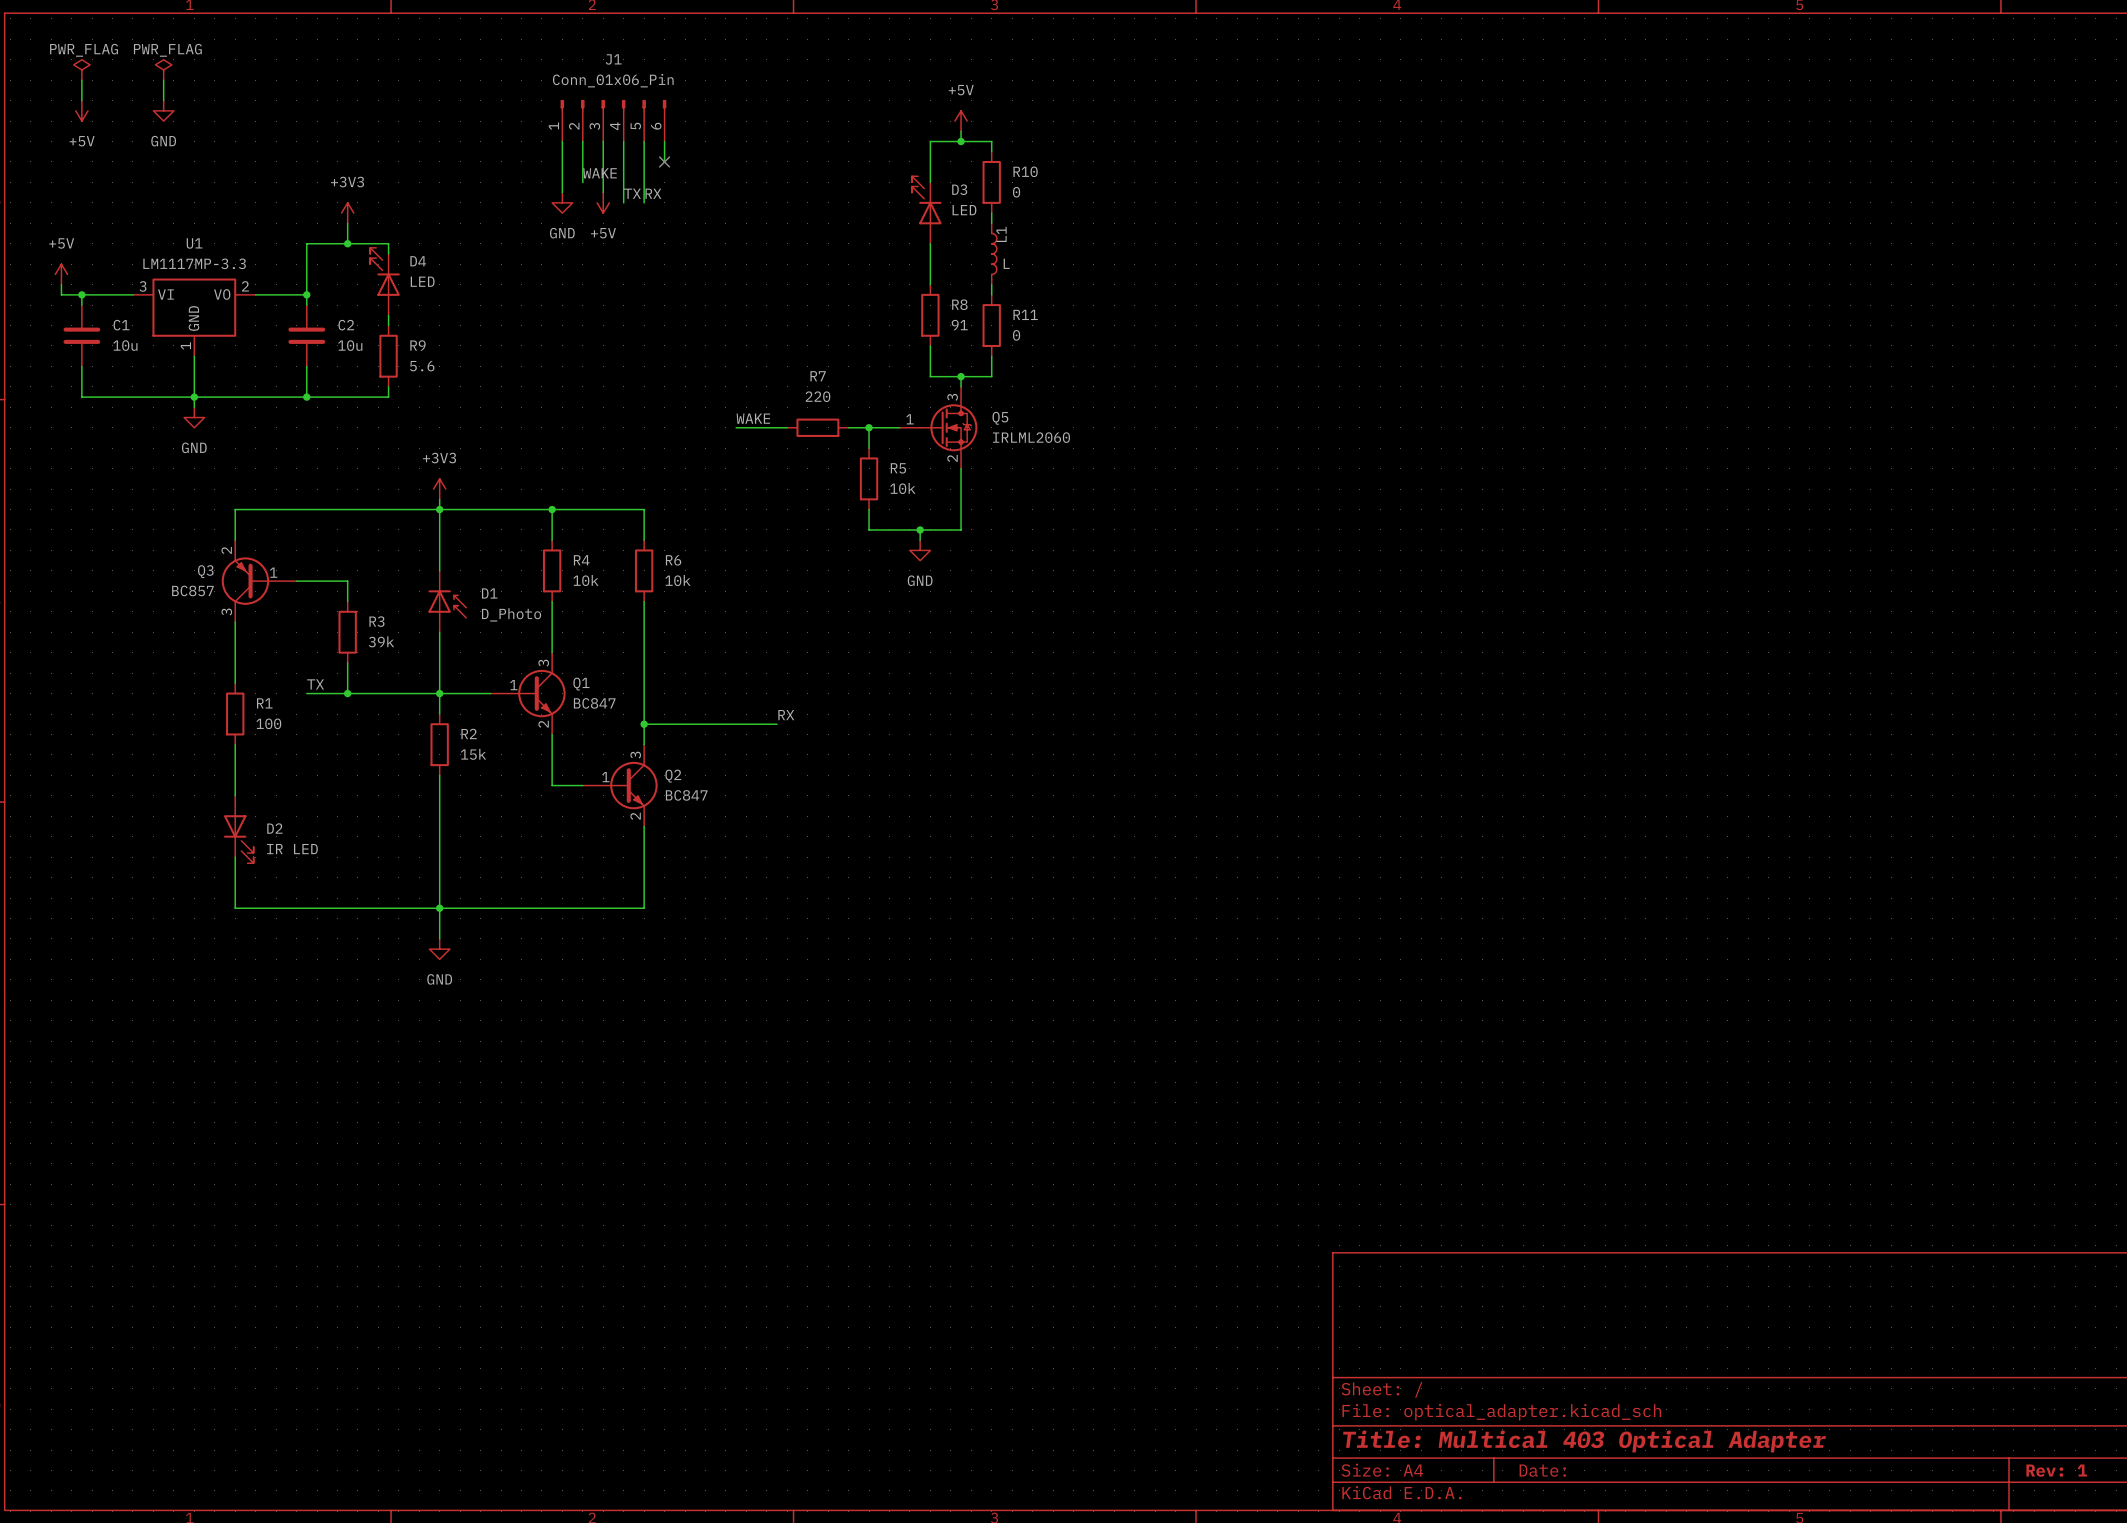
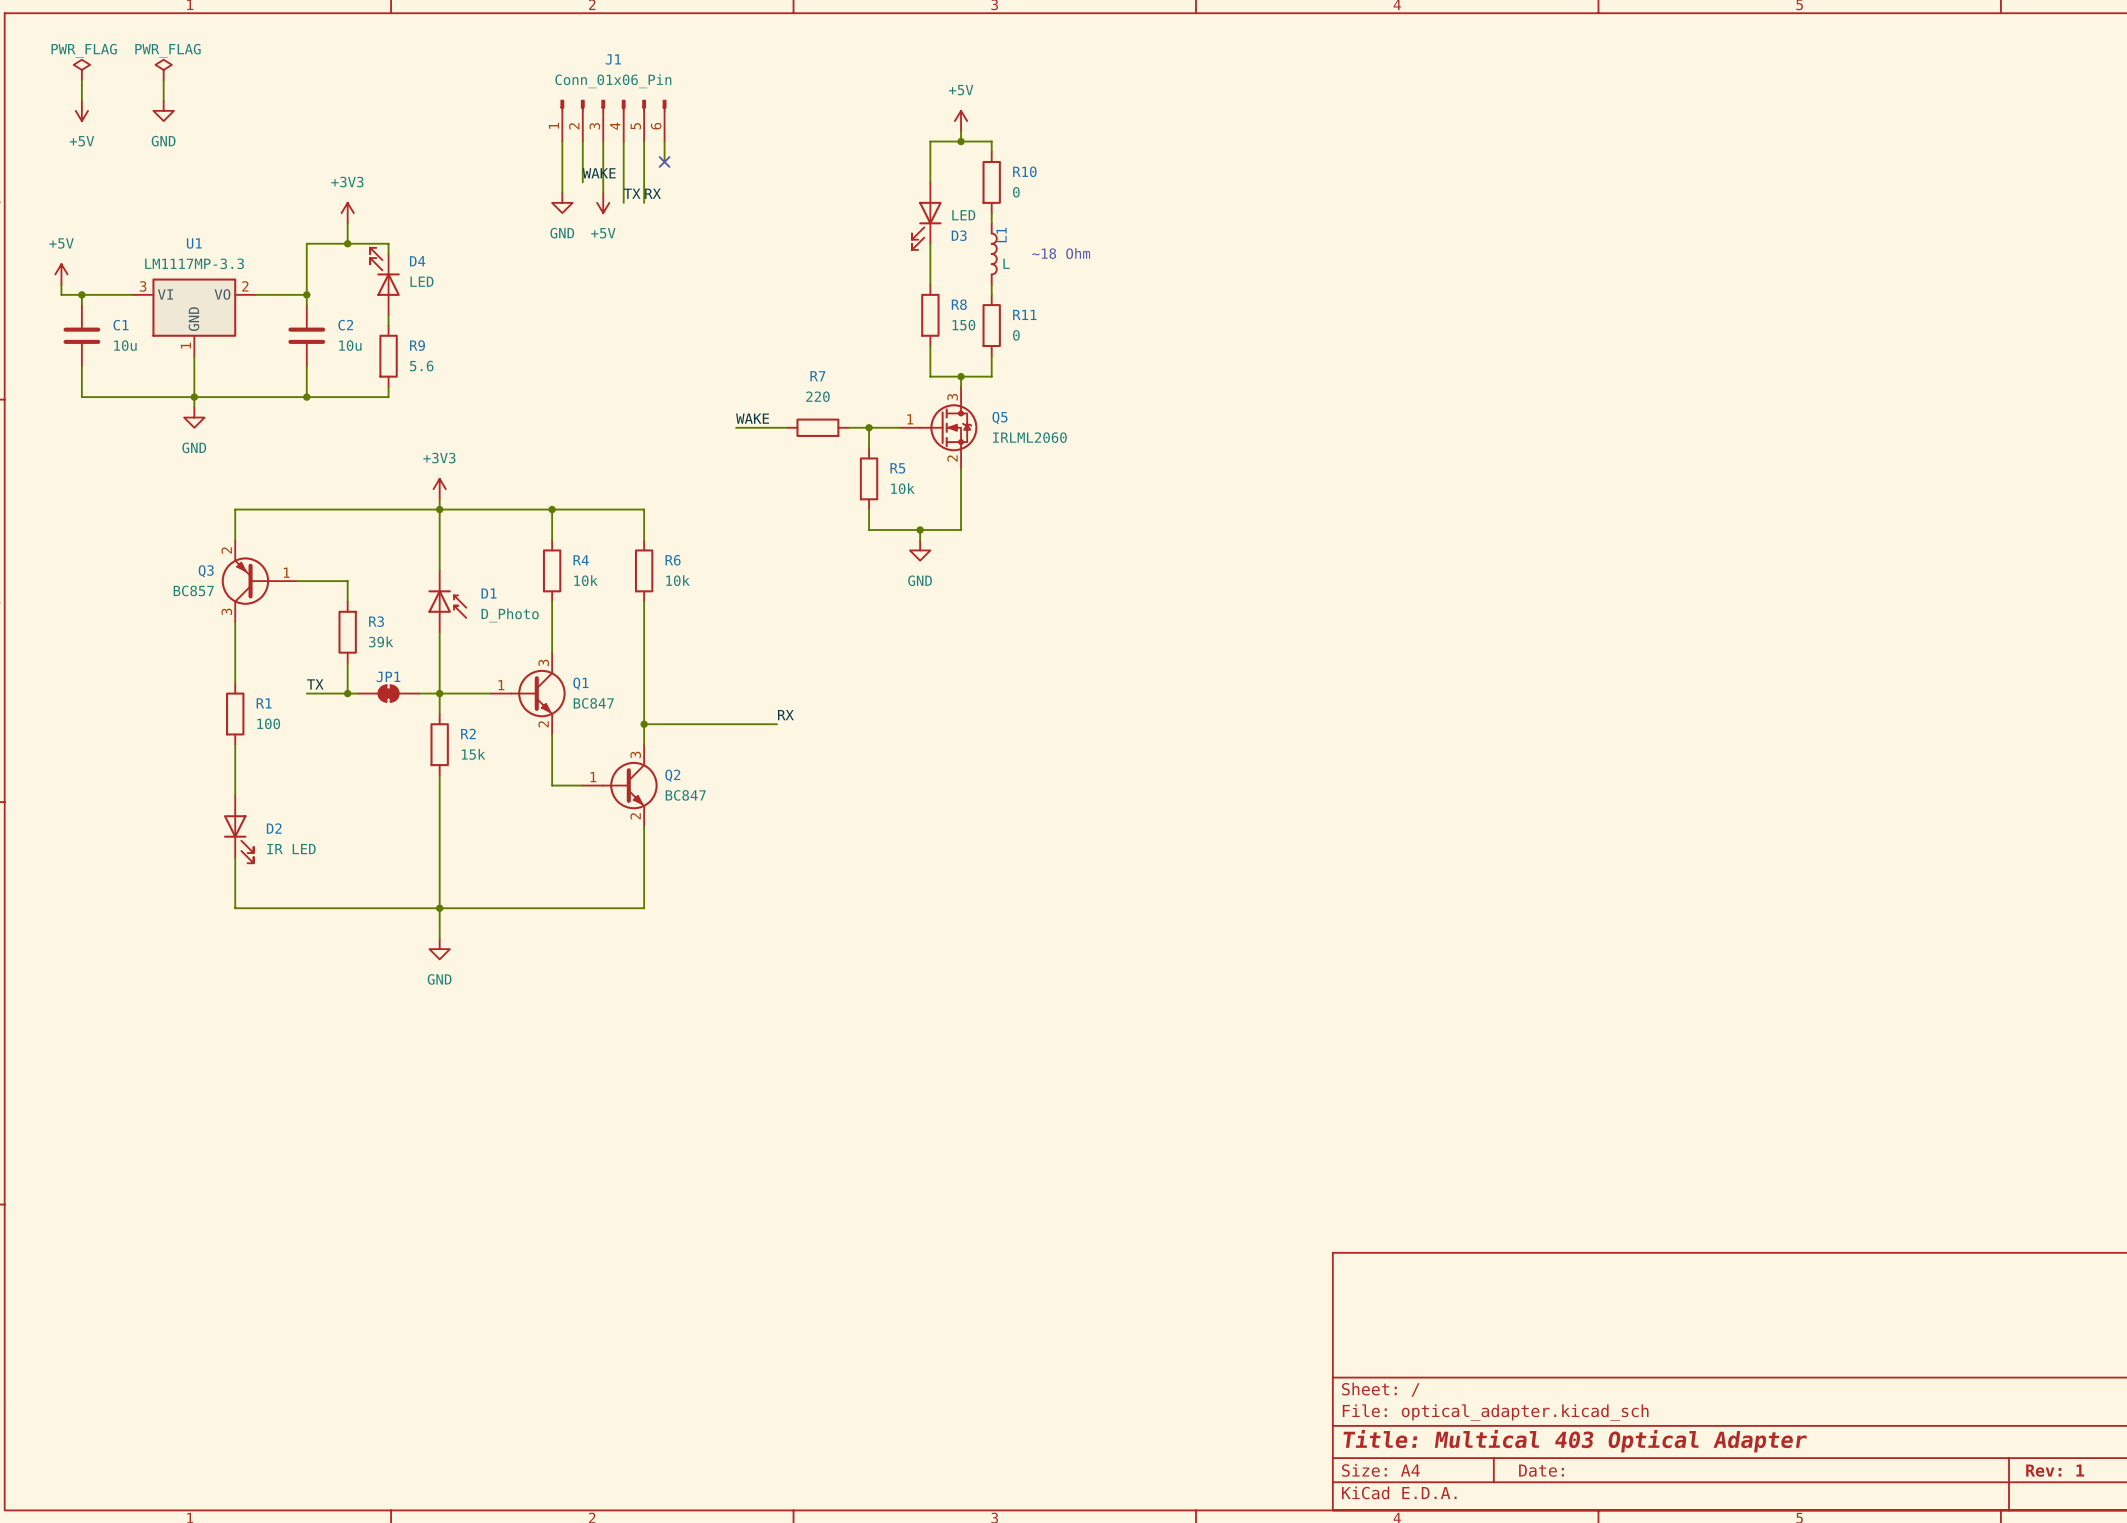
D3 flip: as is (926, 200) -> up-down (926, 225)
text: none -> ~18 Ohm (1061, 253)
R8 value: 91 (959, 325) -> 150 (963, 325)
Q3 symbol: [221, 540, 297, 623] -> [221, 540, 297, 623]
Q1 symbol: [490, 652, 566, 735] -> [490, 652, 566, 735]
JP1: none -> (388, 693)
Q2 symbol: [582, 744, 658, 827] -> [582, 744, 658, 827]

